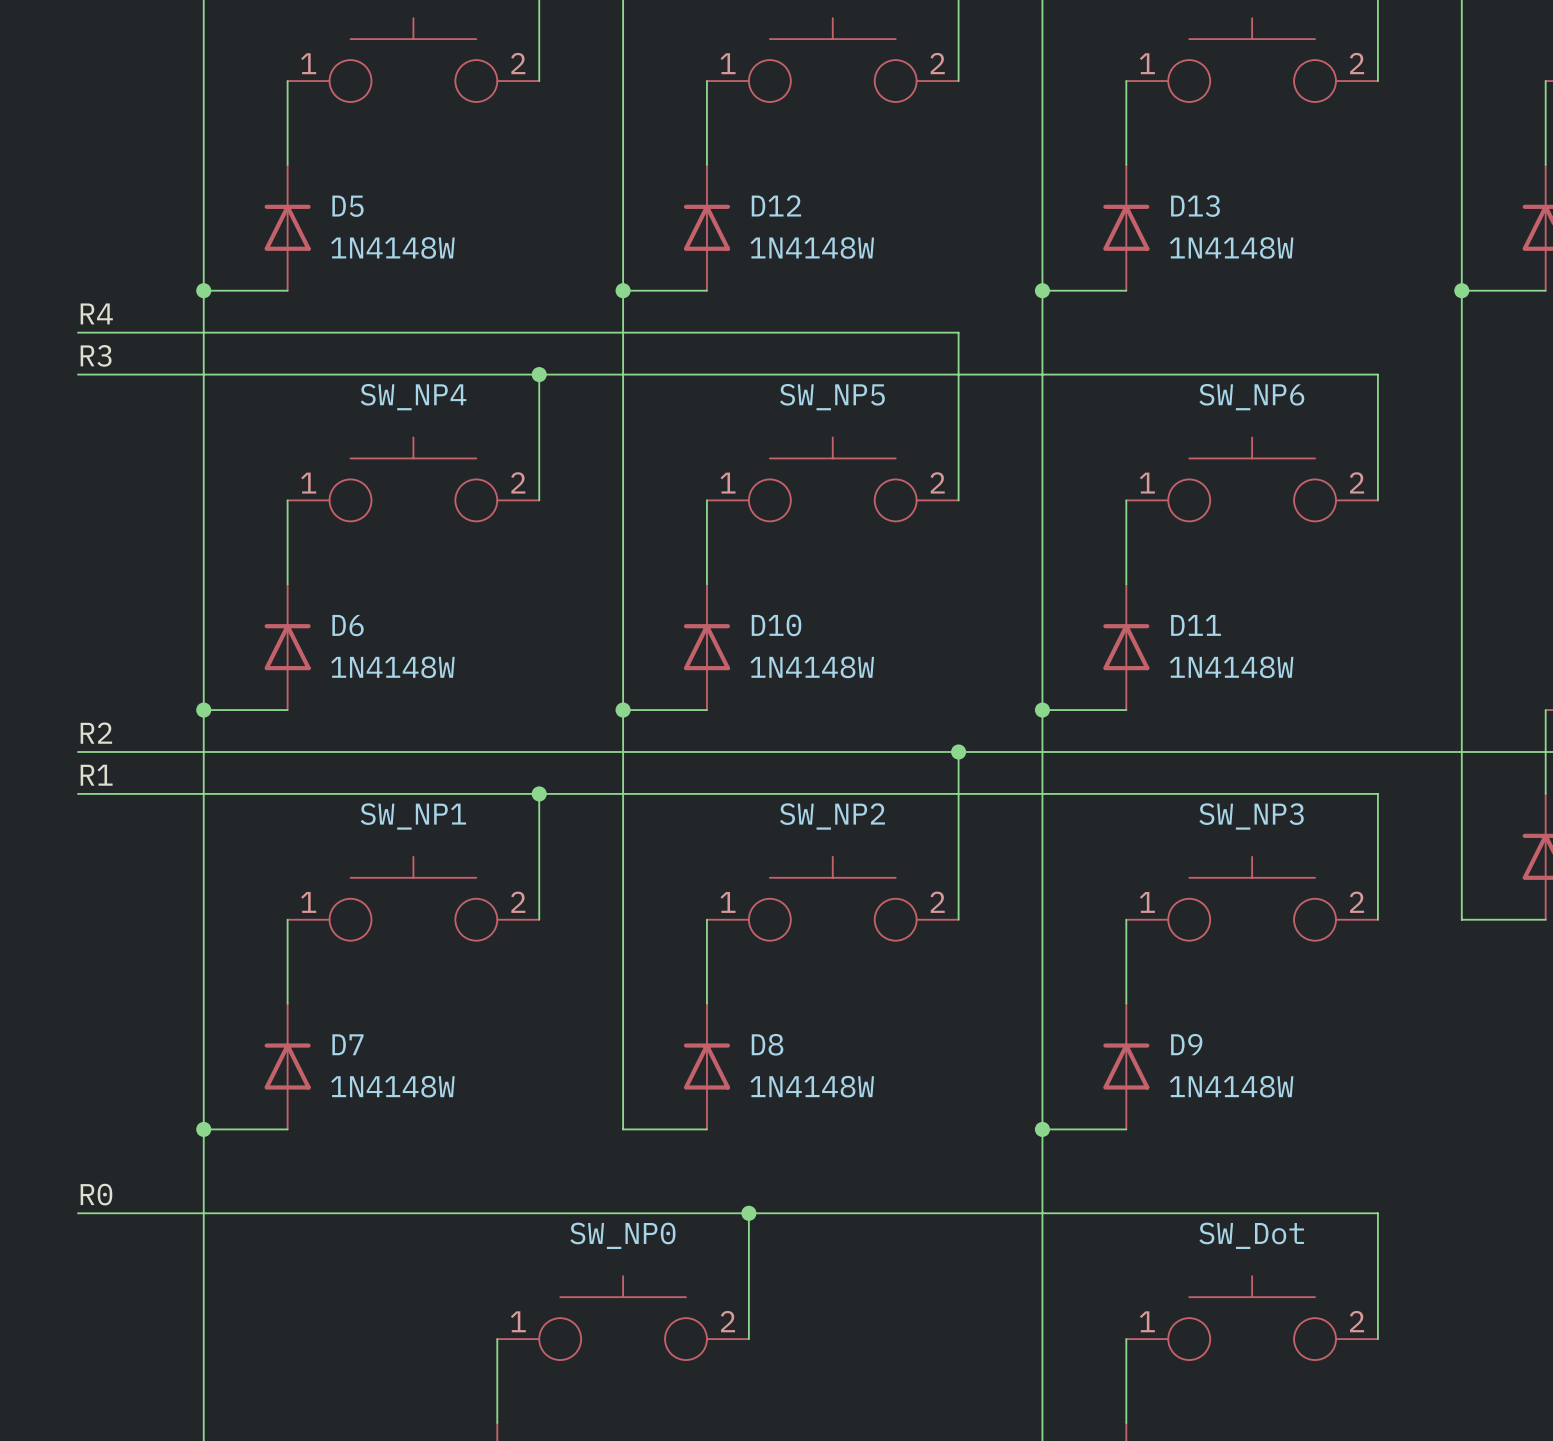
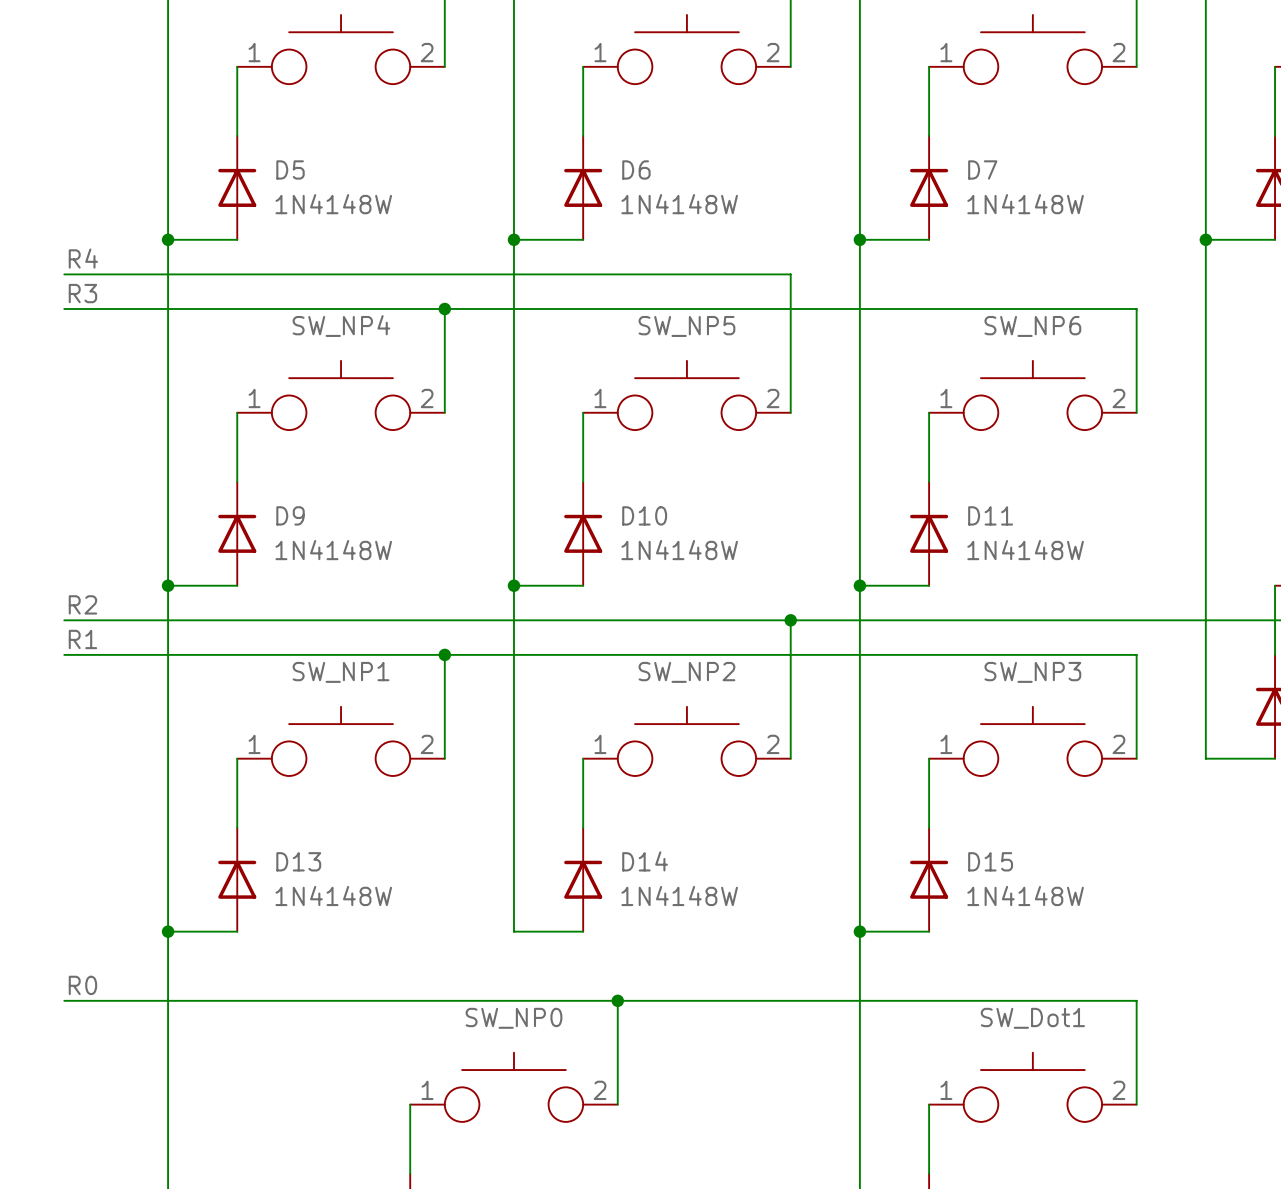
D12 name: D12 (776, 205) -> D6 (636, 169)
D13 name: D13 (1195, 206) -> D7 (982, 169)
D6 name: D6 (348, 625) -> D9 (290, 515)
D7 name: D7 (347, 1044) -> D13 (298, 861)
D8 name: D8 (767, 1044) -> D14 (645, 861)
D9 name: D9 (1186, 1044) -> D15 (990, 861)
SW_Dot name: SW_Dot (1251, 1235) -> SW_Dot1 (1032, 1018)

